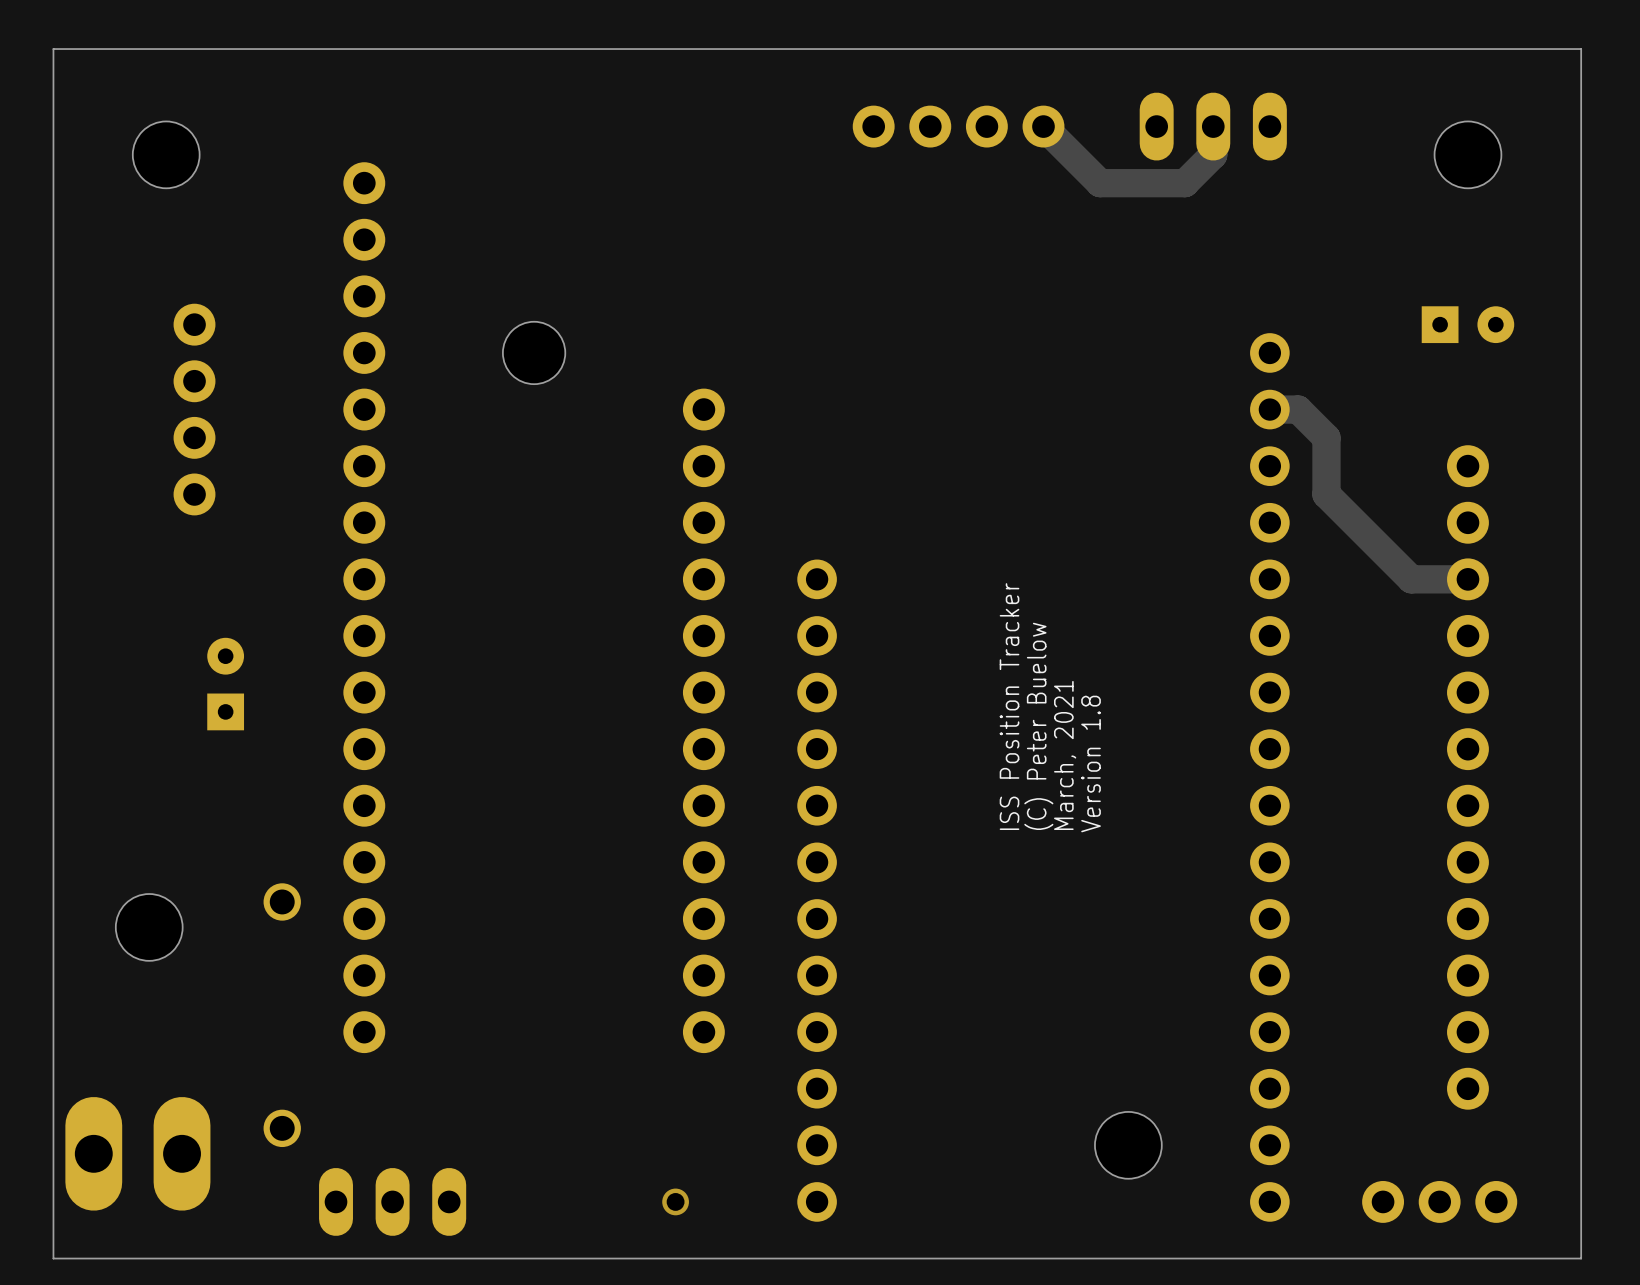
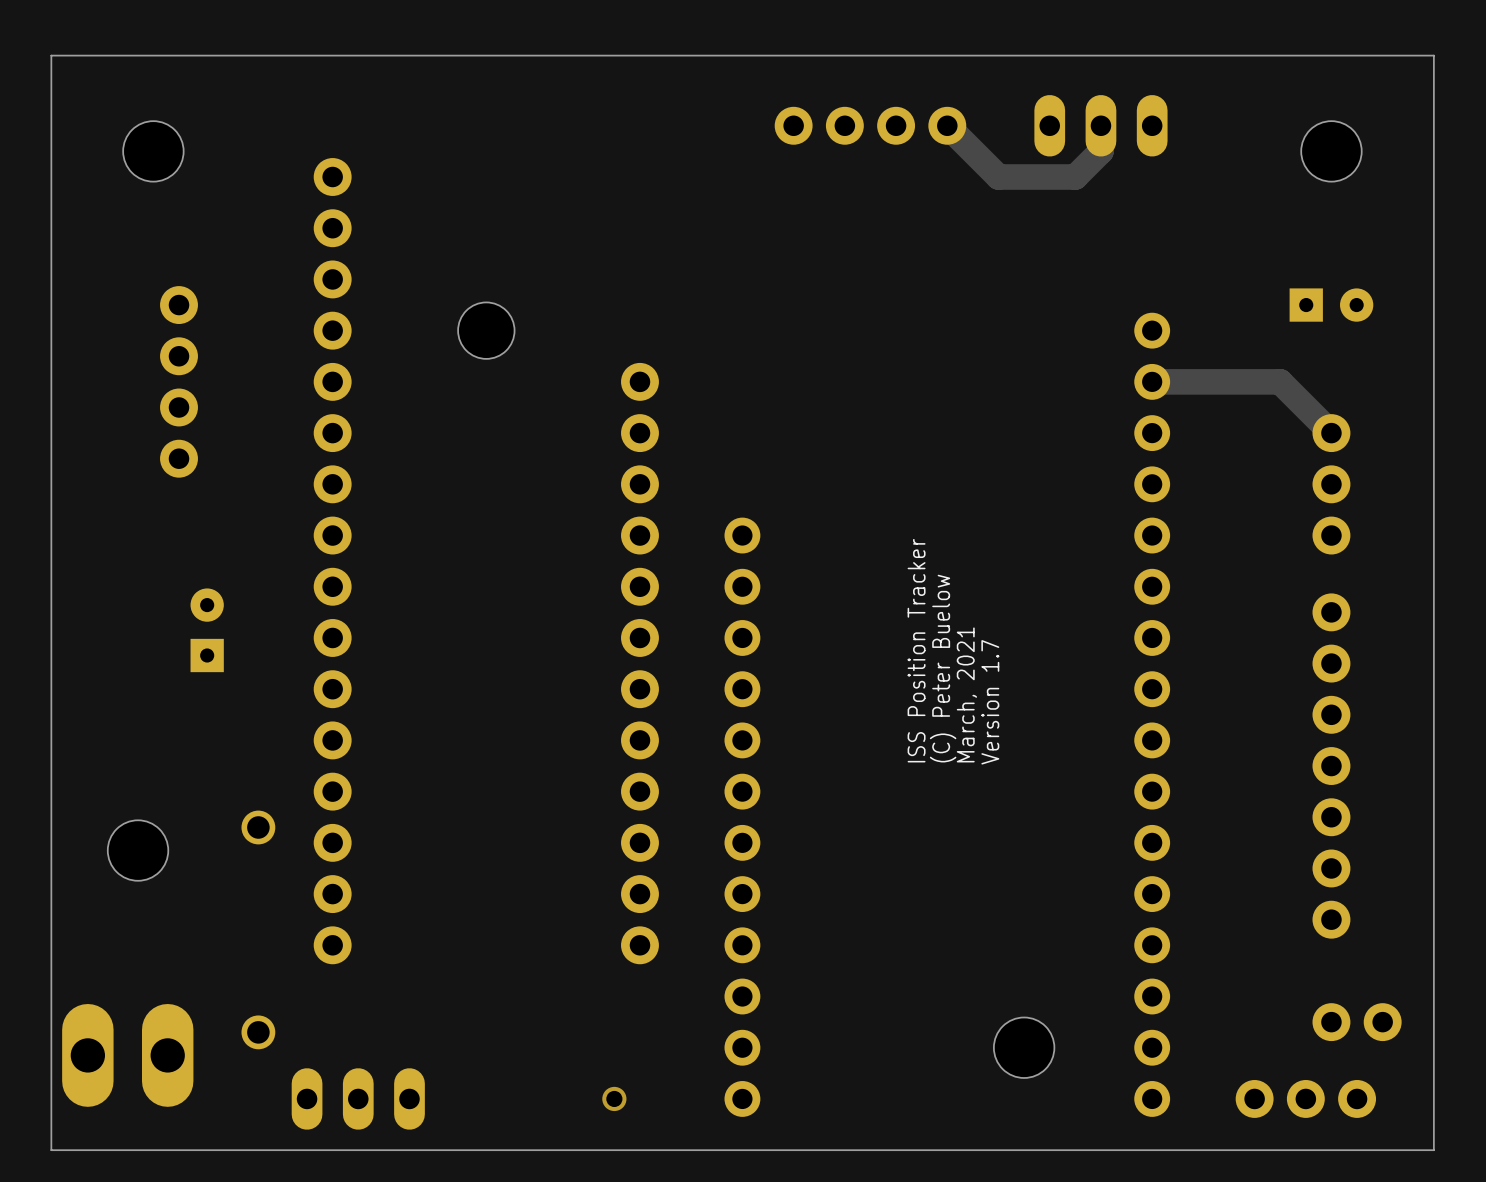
track: (1298, 409) (1326, 437) (1326, 494) (1411, 579) (1467, 579) -> (1177, 381) (1280, 381) (1331, 433)
part: (1467, 494) -> none
part position: (1467, 635) -> (1331, 484)
text: Version 1.8 (1091, 764) -> Version 1.7 (990, 702)
part position: (1467, 918) -> (1331, 766)
part: none -> (1357, 1022)

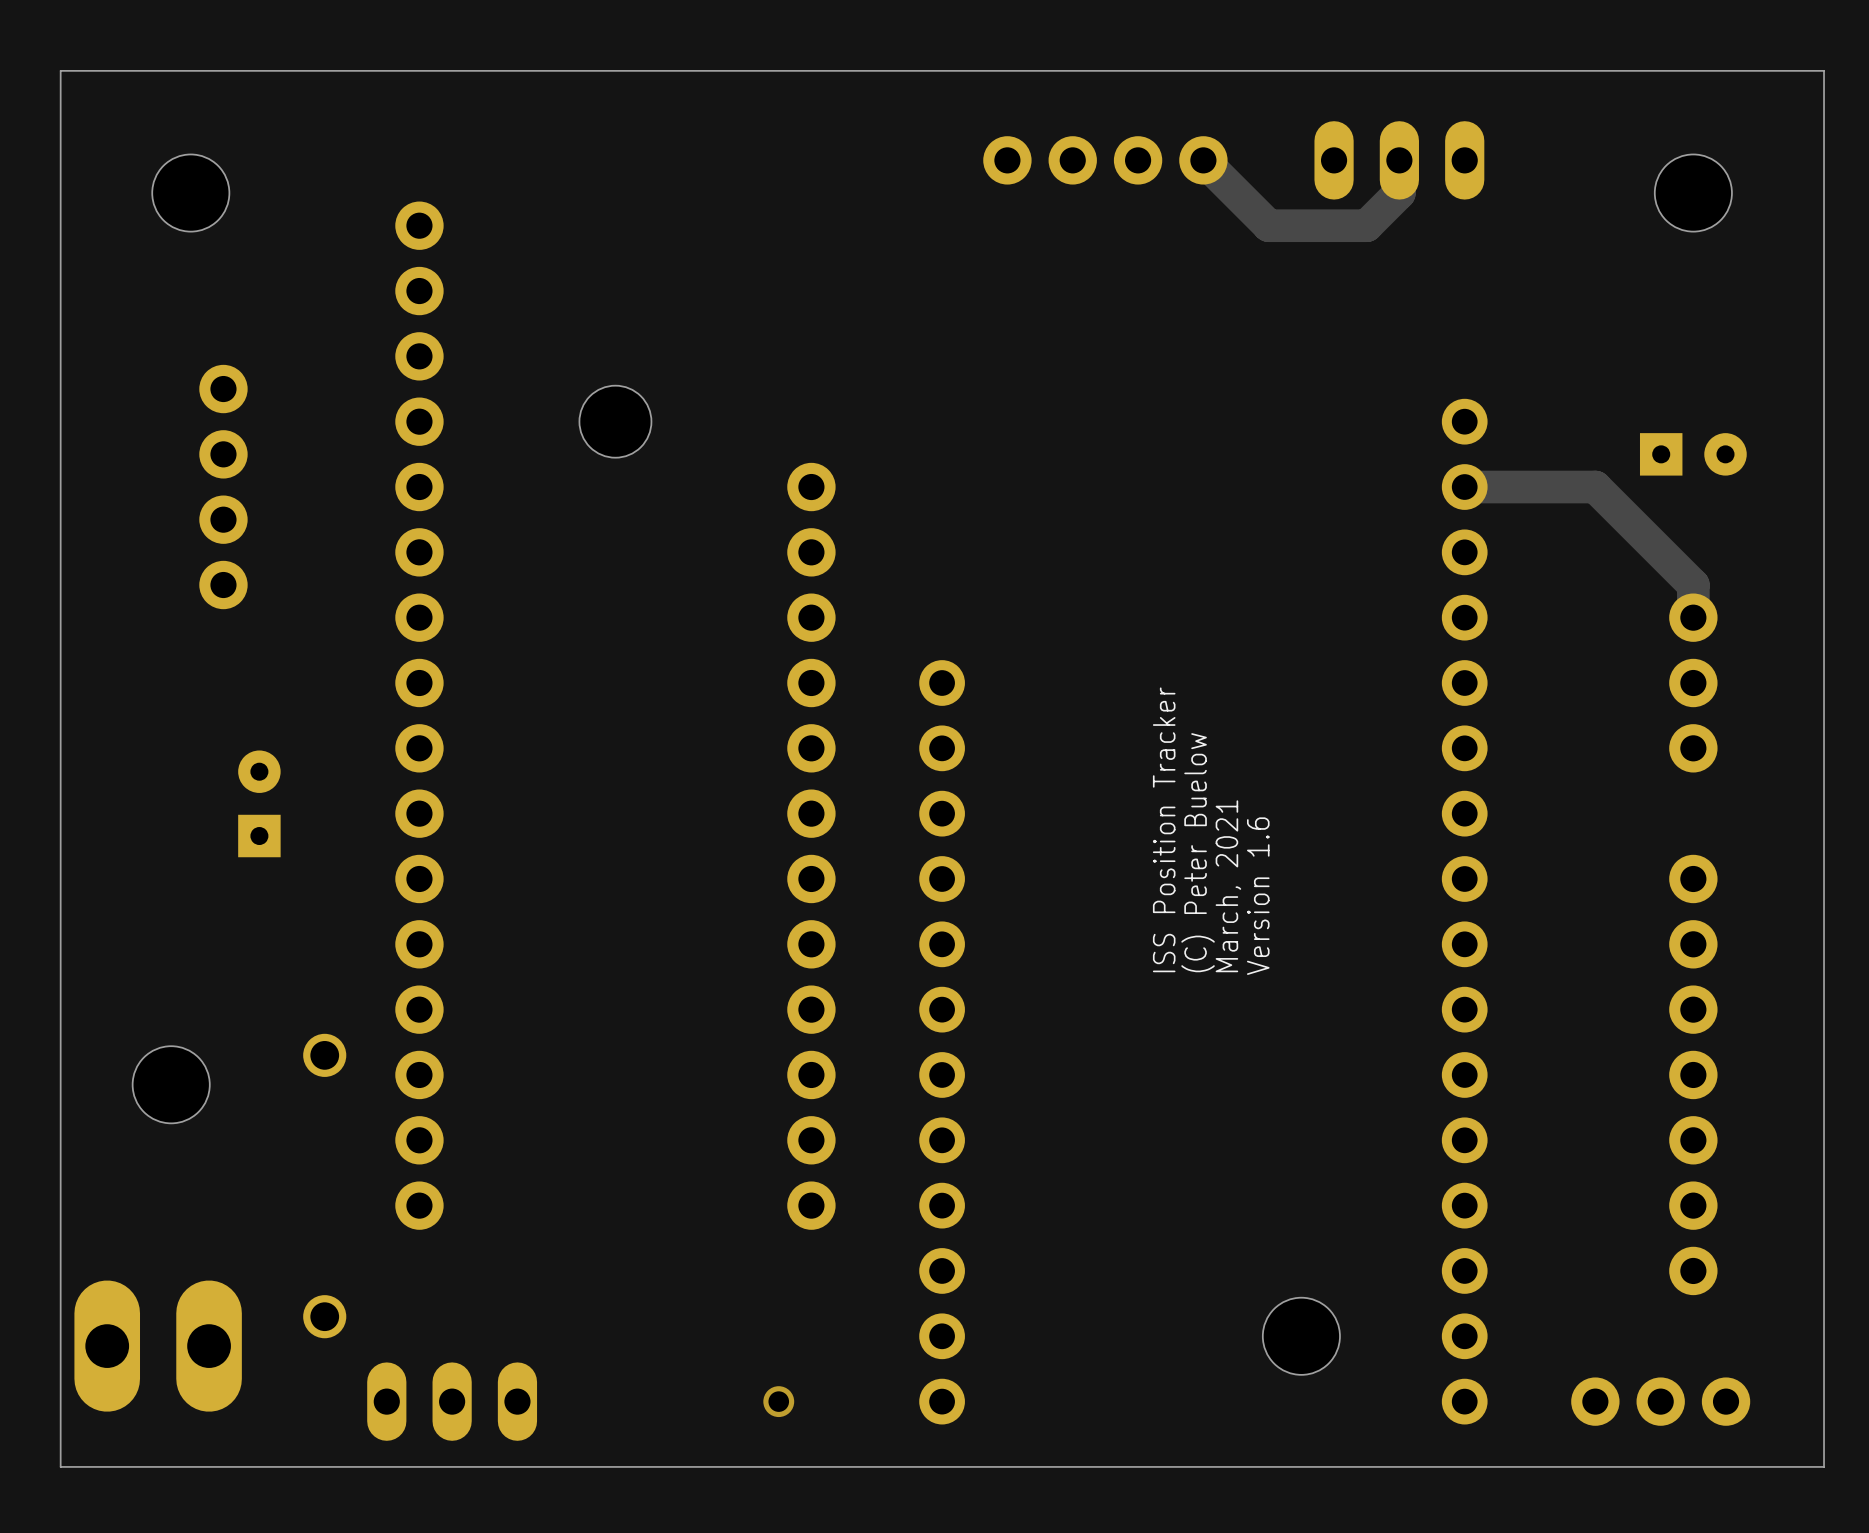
part position: (1331, 305) -> (1693, 454)
track: (1254, 381) (1280, 381) (1331, 433) -> (1595, 487) (1693, 585) (1693, 617)
part position: (1331, 484) -> (1693, 683)
text: Version 1.7 (990, 702) -> Version 1.6 (1258, 896)
part position: (1331, 766) -> (1693, 1074)
part: (1357, 1022) -> none

